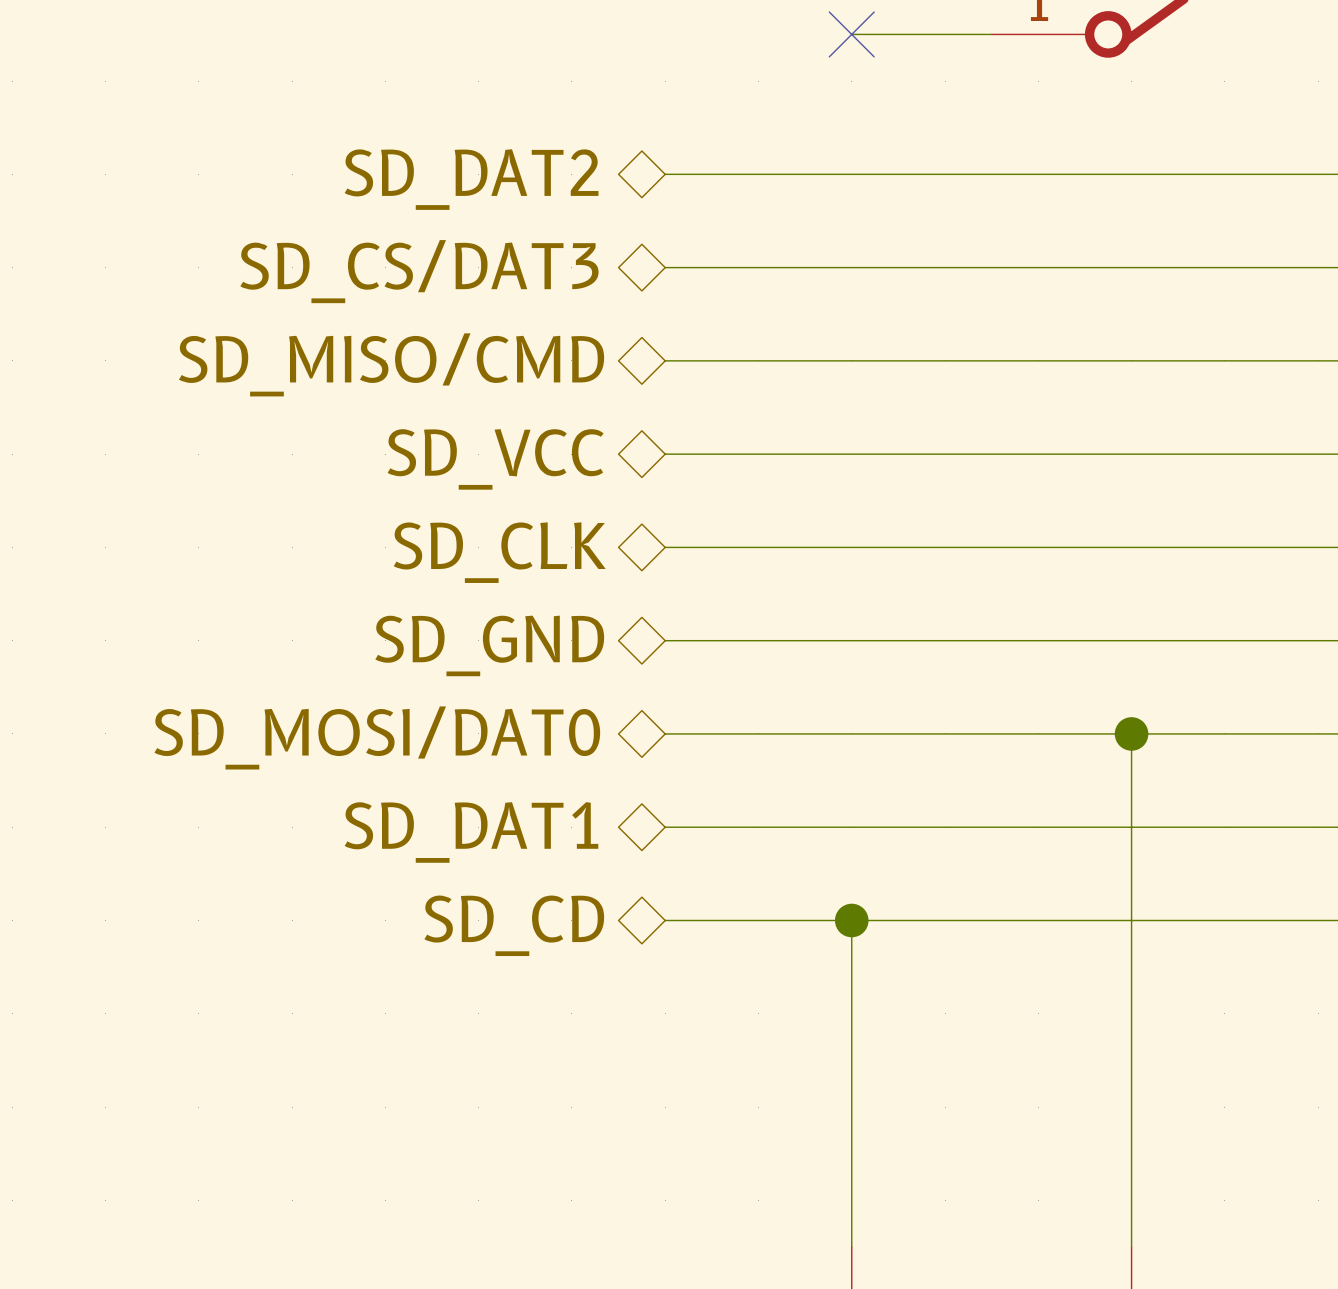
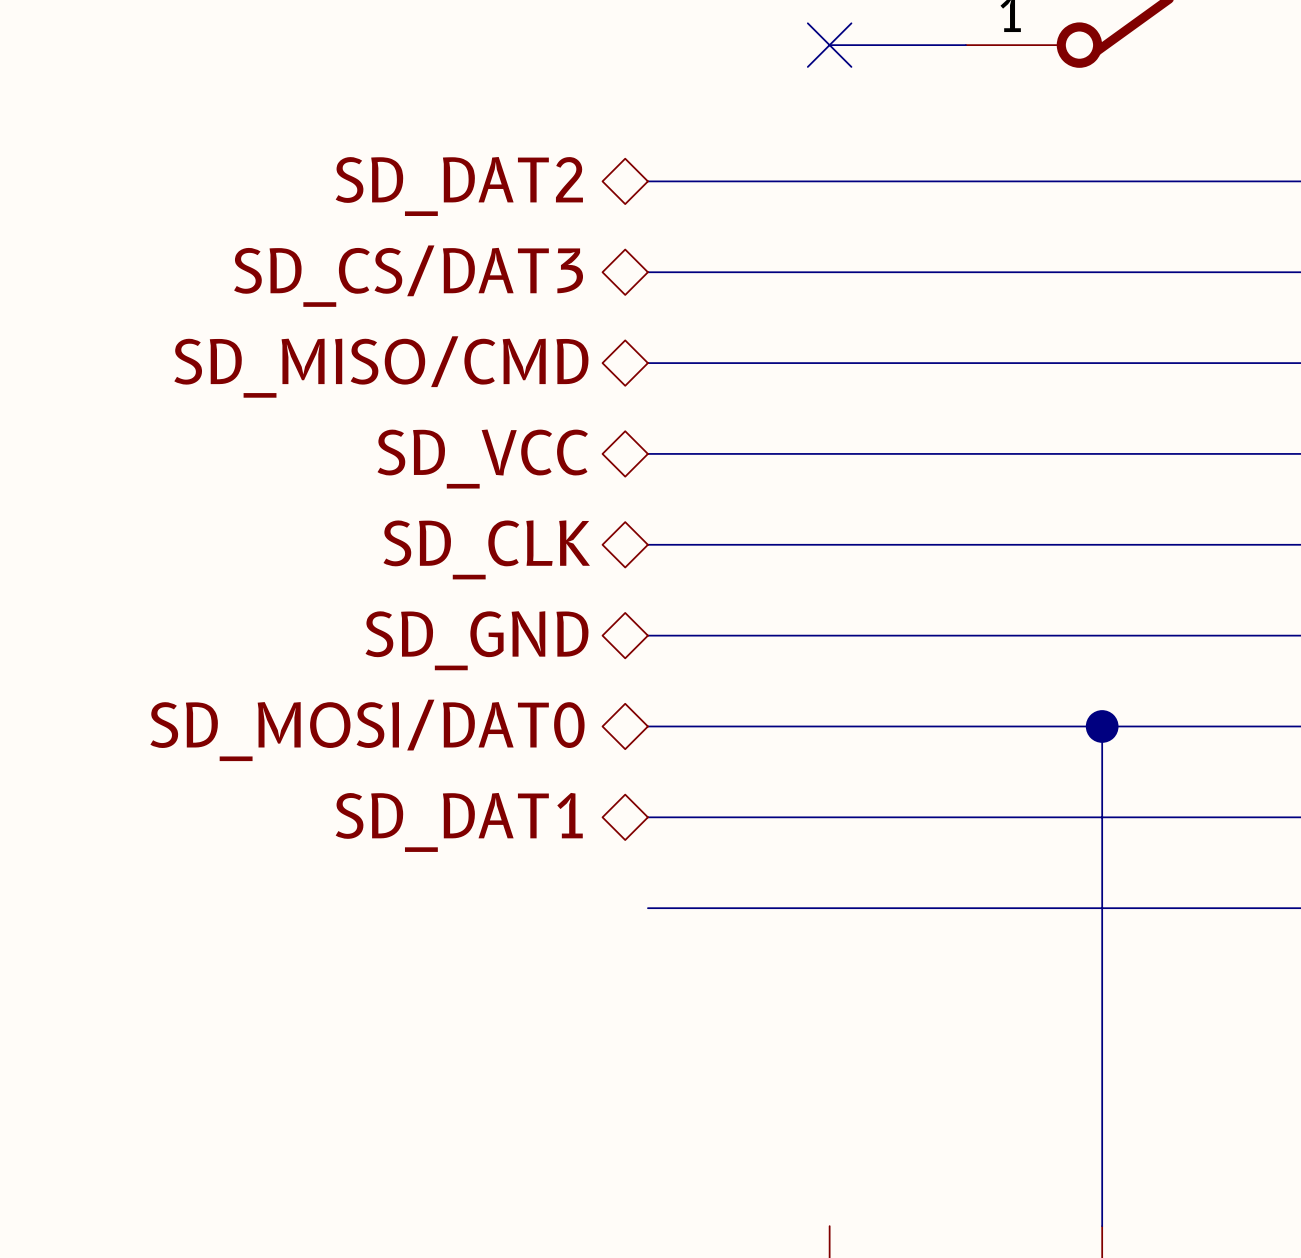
wire: (851, 920) (851, 1246) -> none
junction: (851, 920) -> none
hierarchical label: SD_CD (514, 925) -> none

